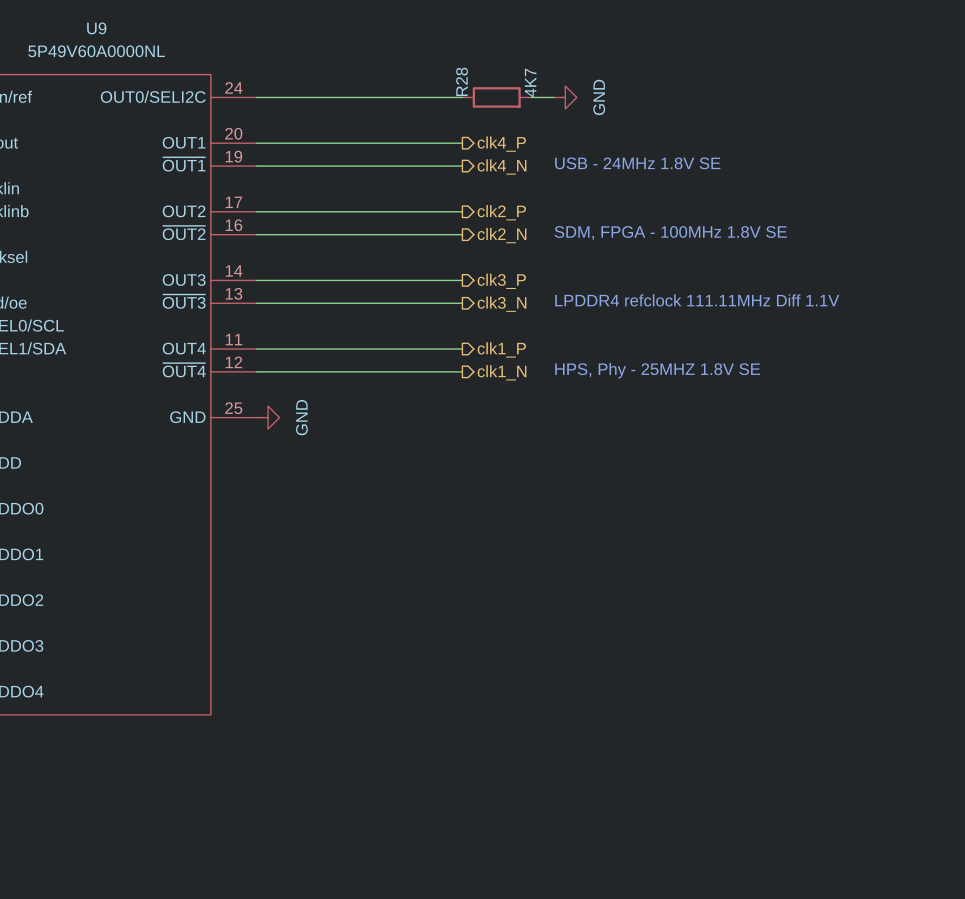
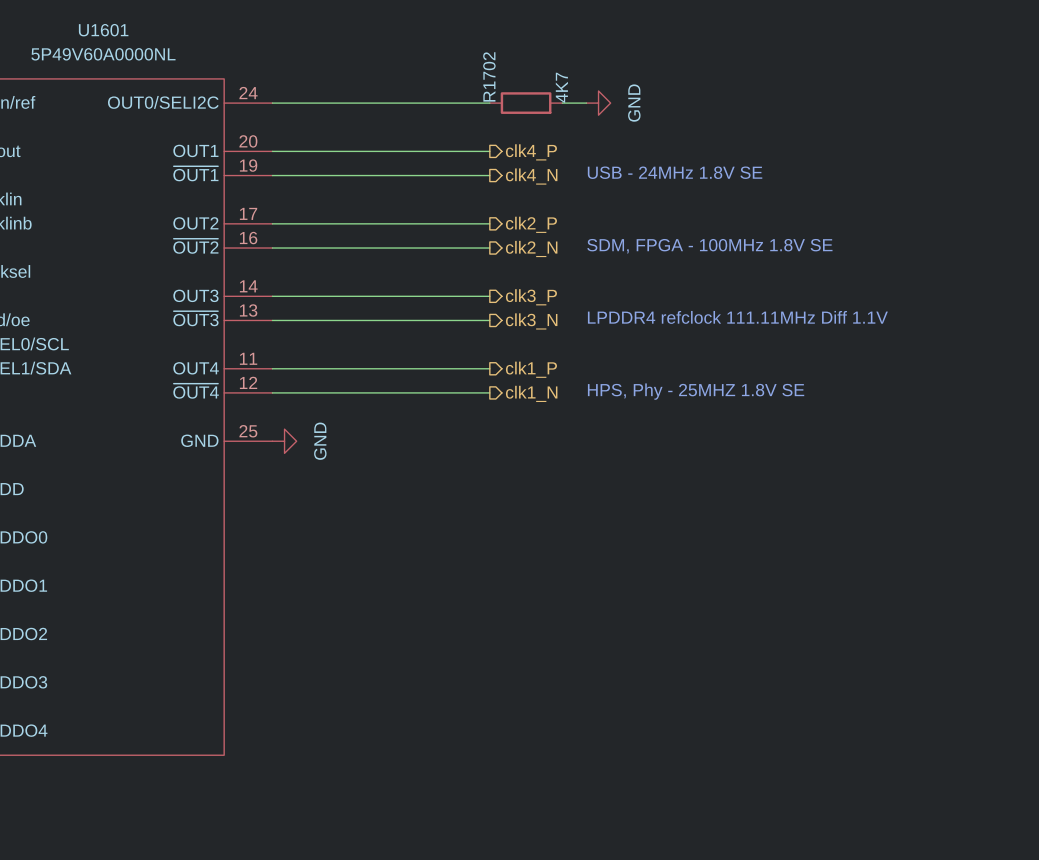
U9 name: U9 (96, 28) -> U1601 (103, 30)
R28 name: R28 (461, 81) -> R1702 (489, 76)

